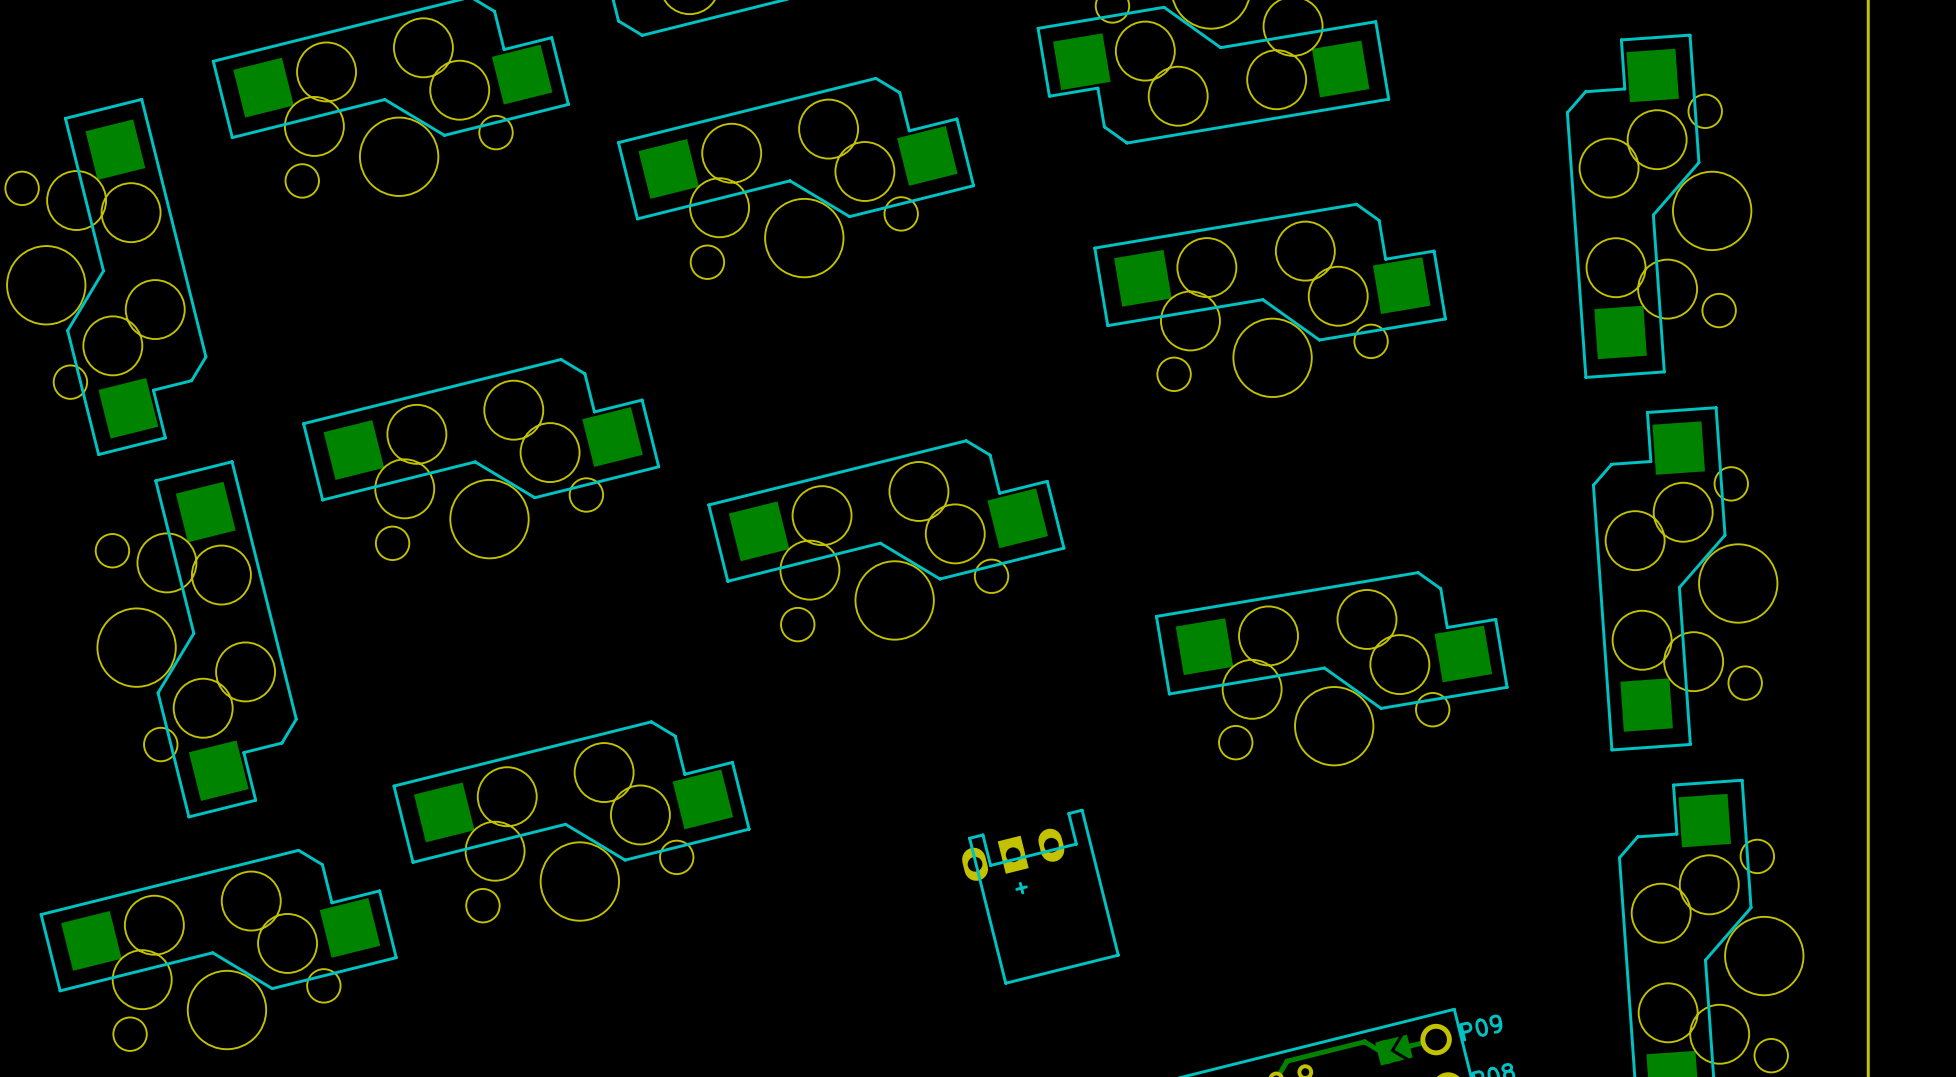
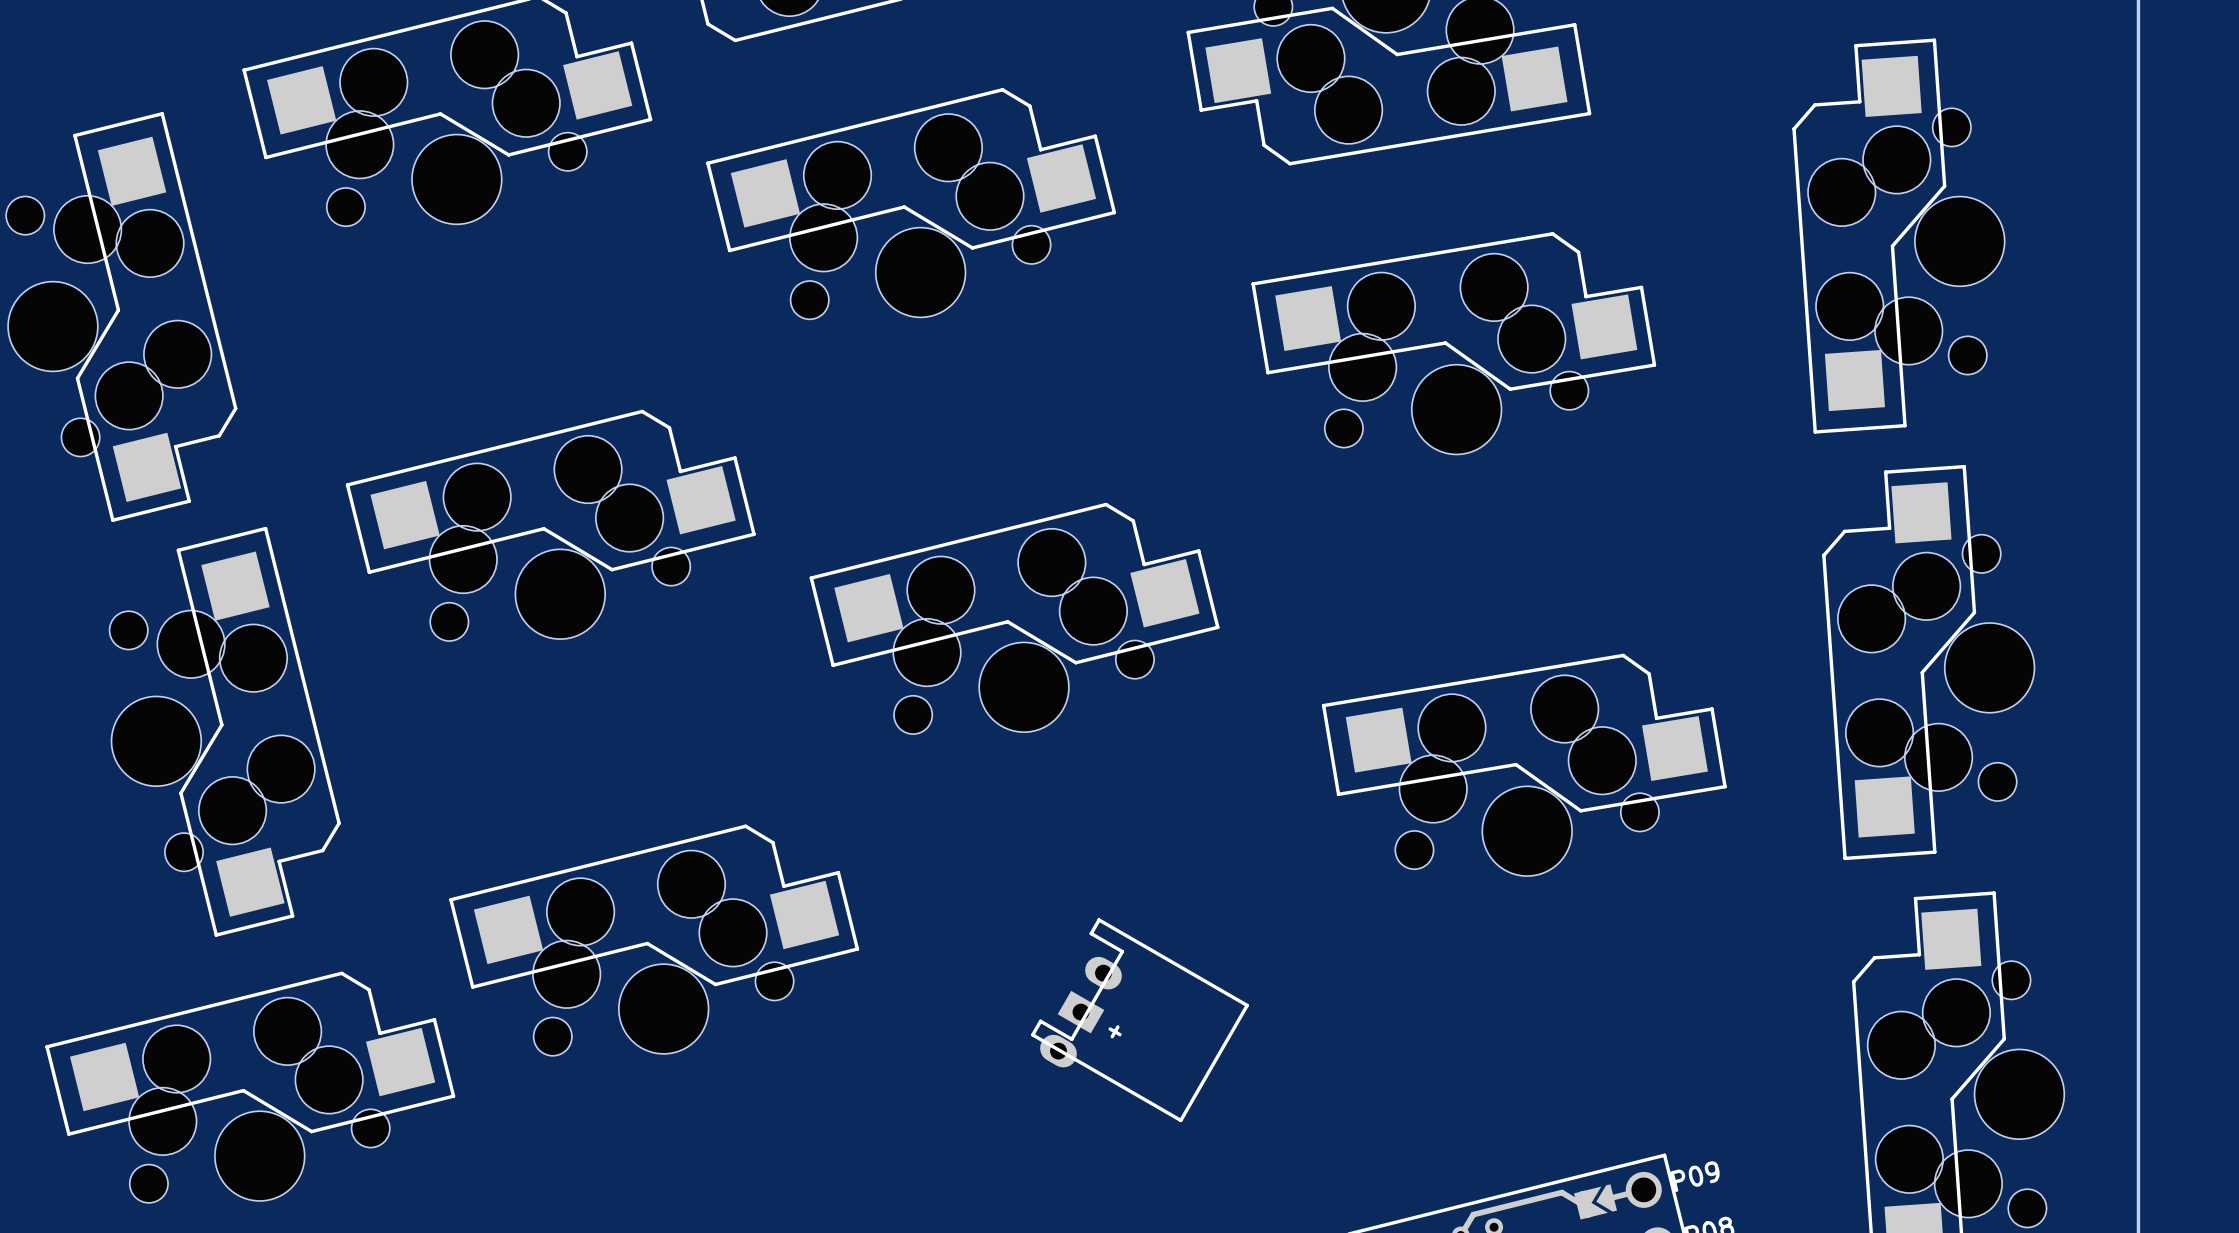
part: none -> (1139, 1020)
part: (1040, 896) -> none

